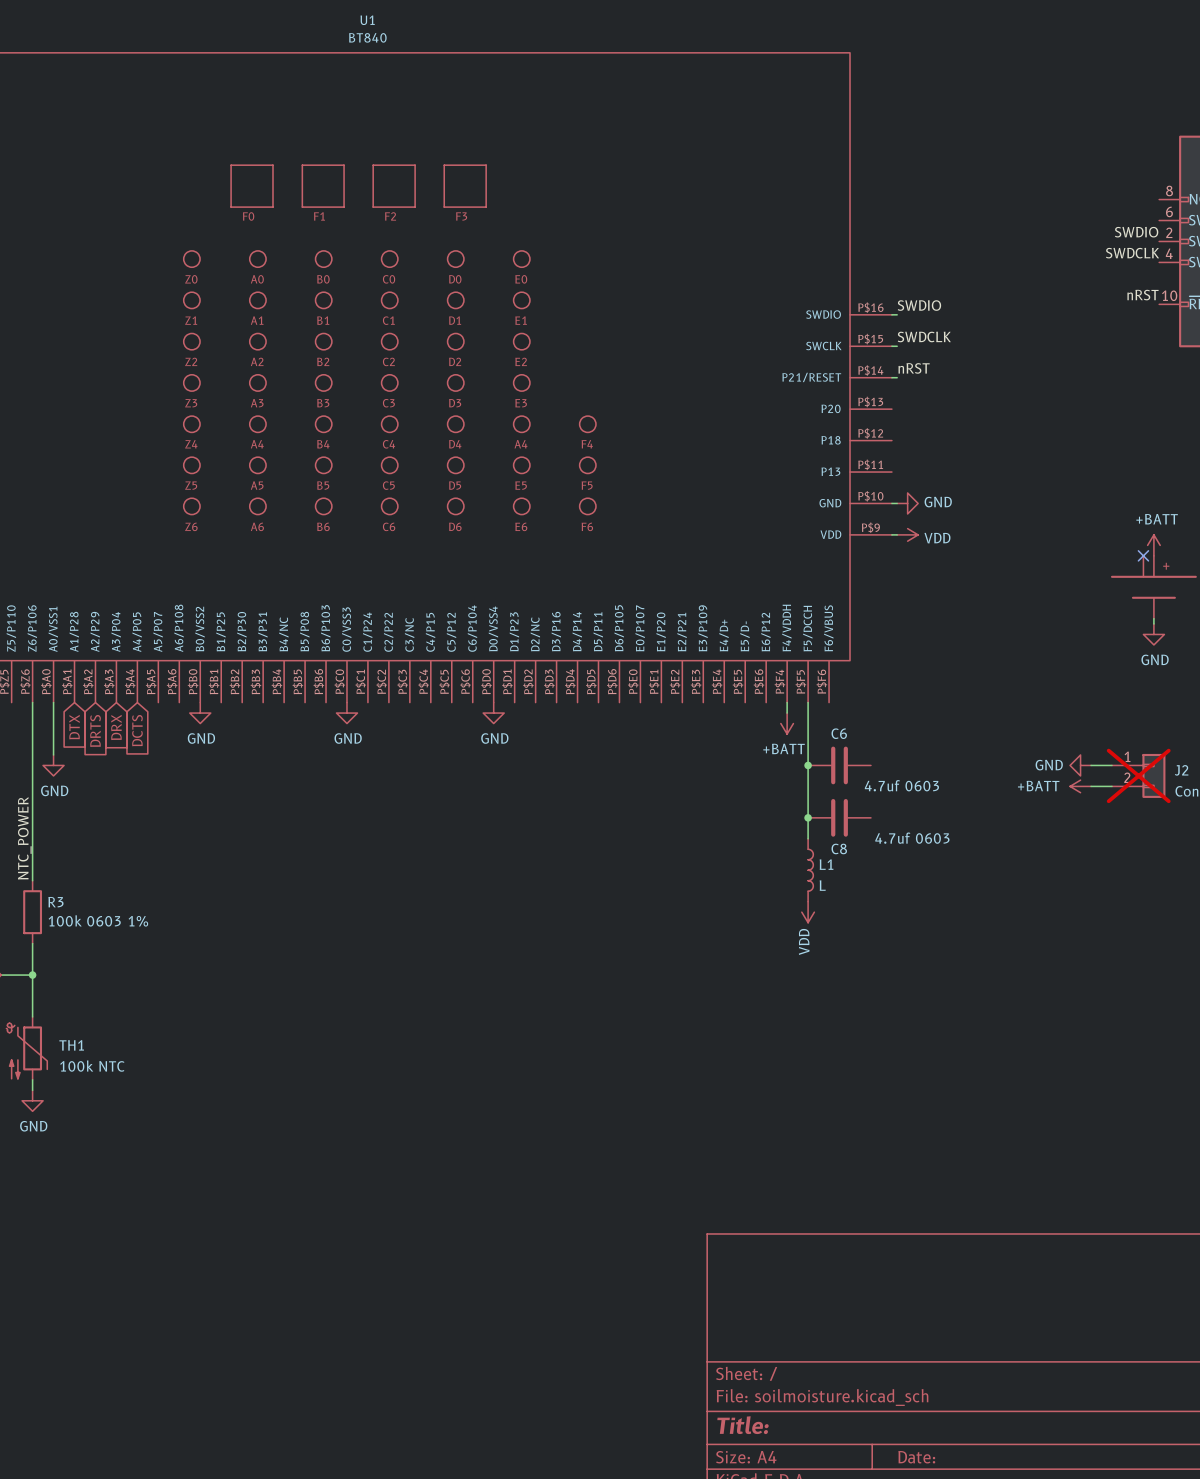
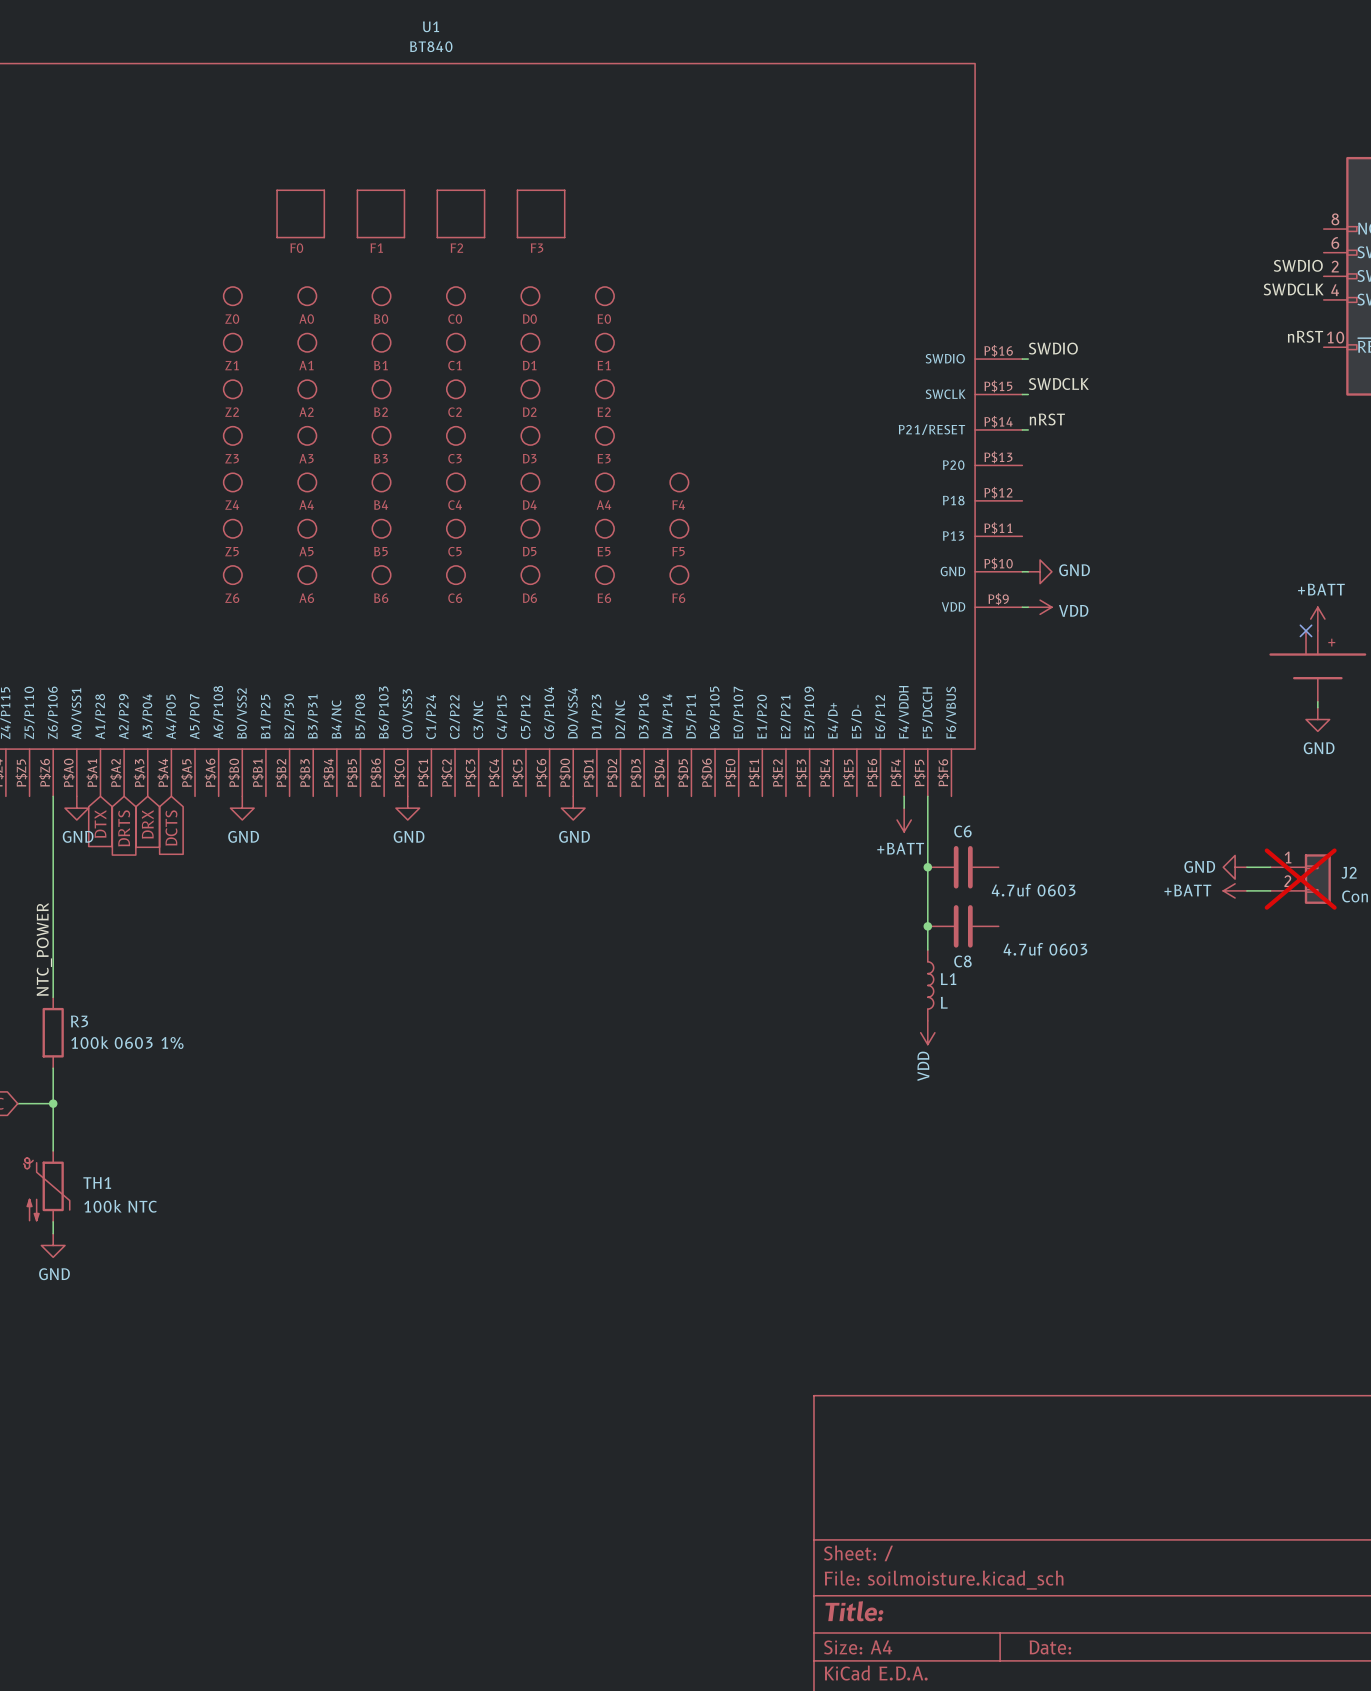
wire: (53, 702) (53, 754) -> none
power symbol position: GND (53, 765) -> GND (76, 808)

